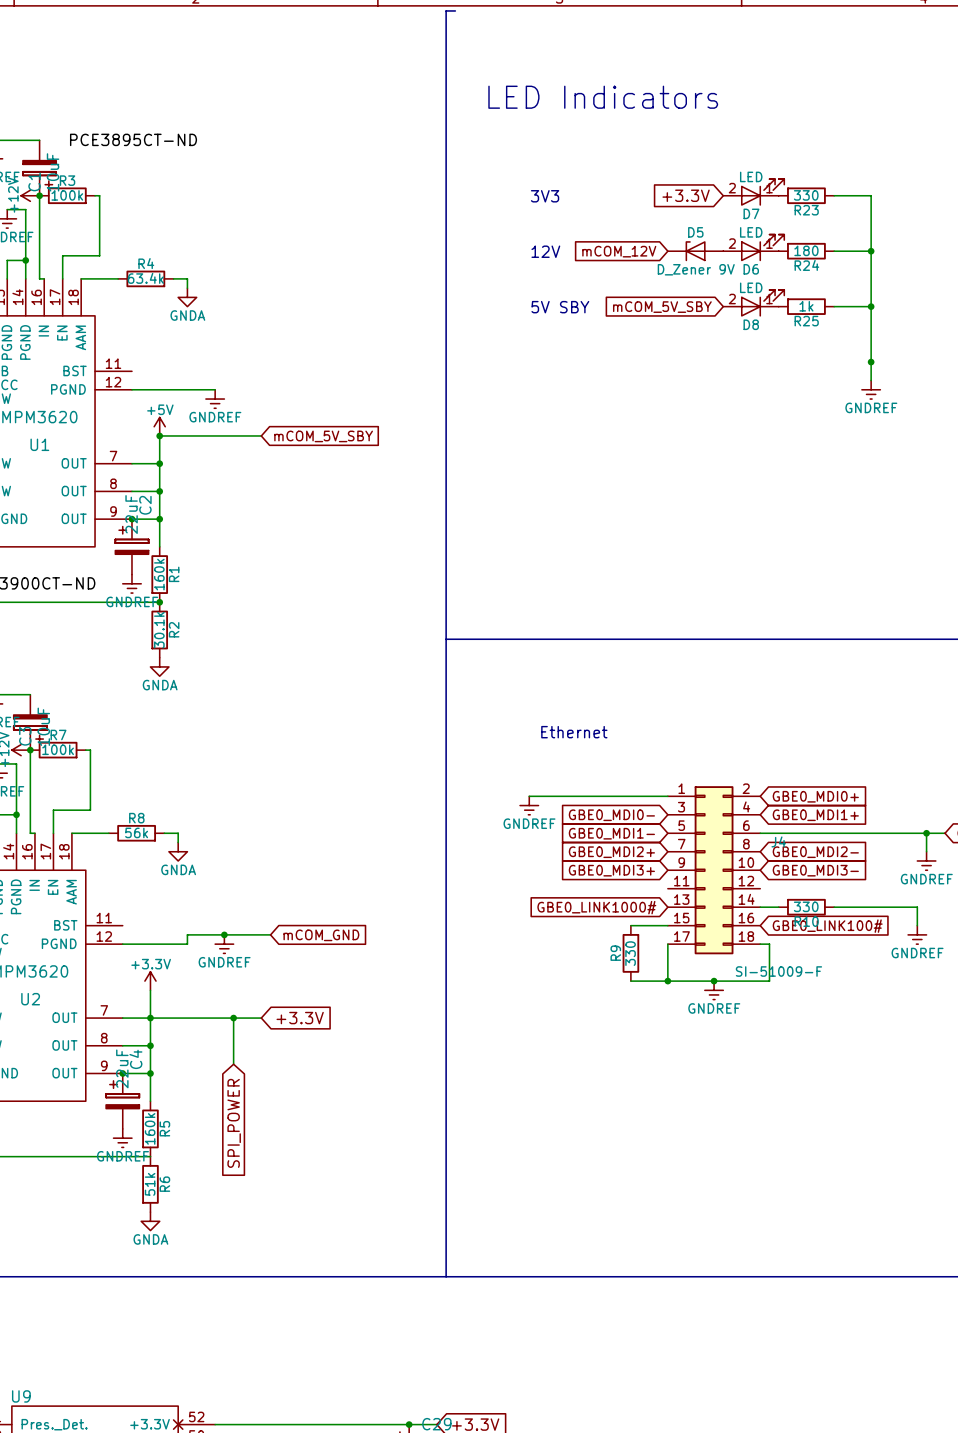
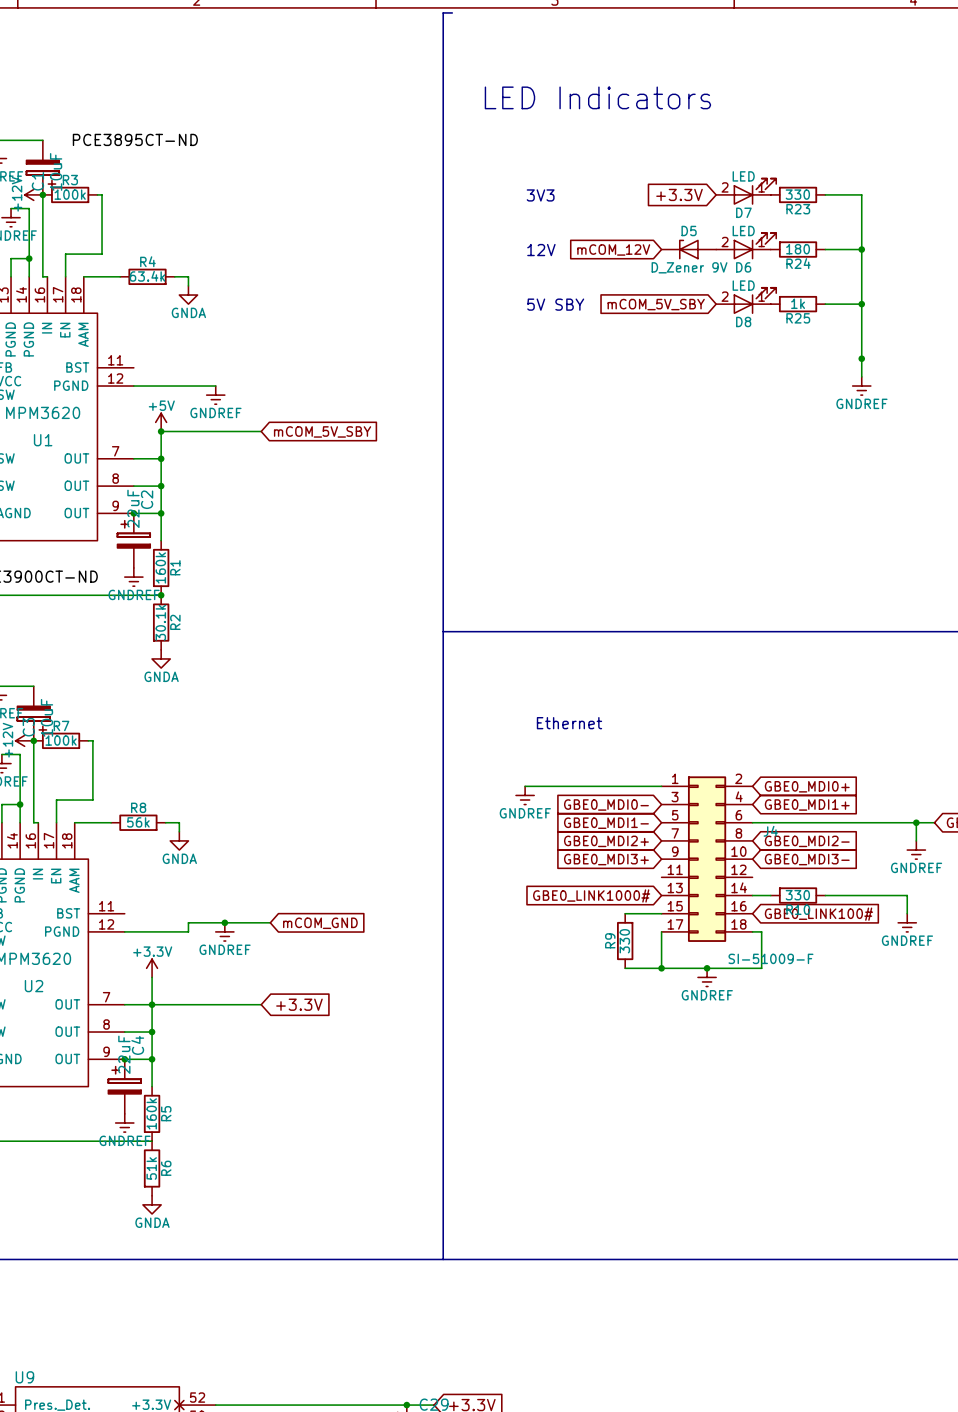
wire: (233, 1018) (233, 1064) -> none
junction: (233, 1018) -> none
global label: SPI_POWER (234, 1123) -> none

